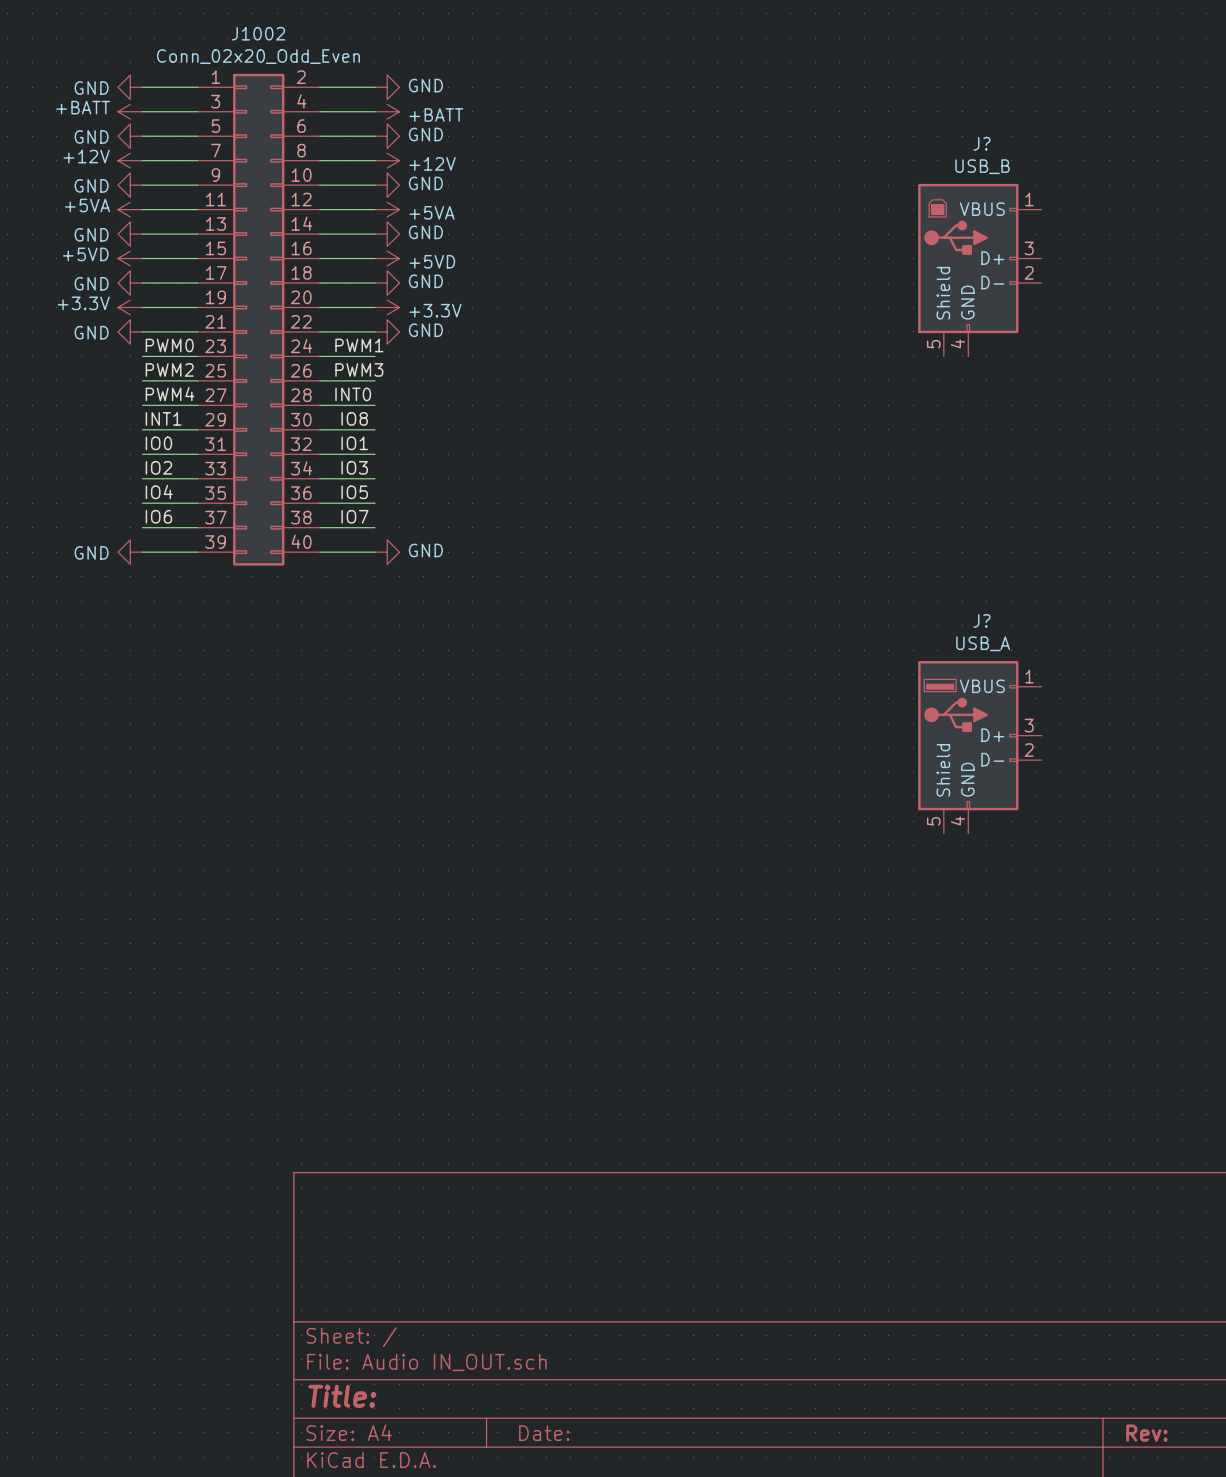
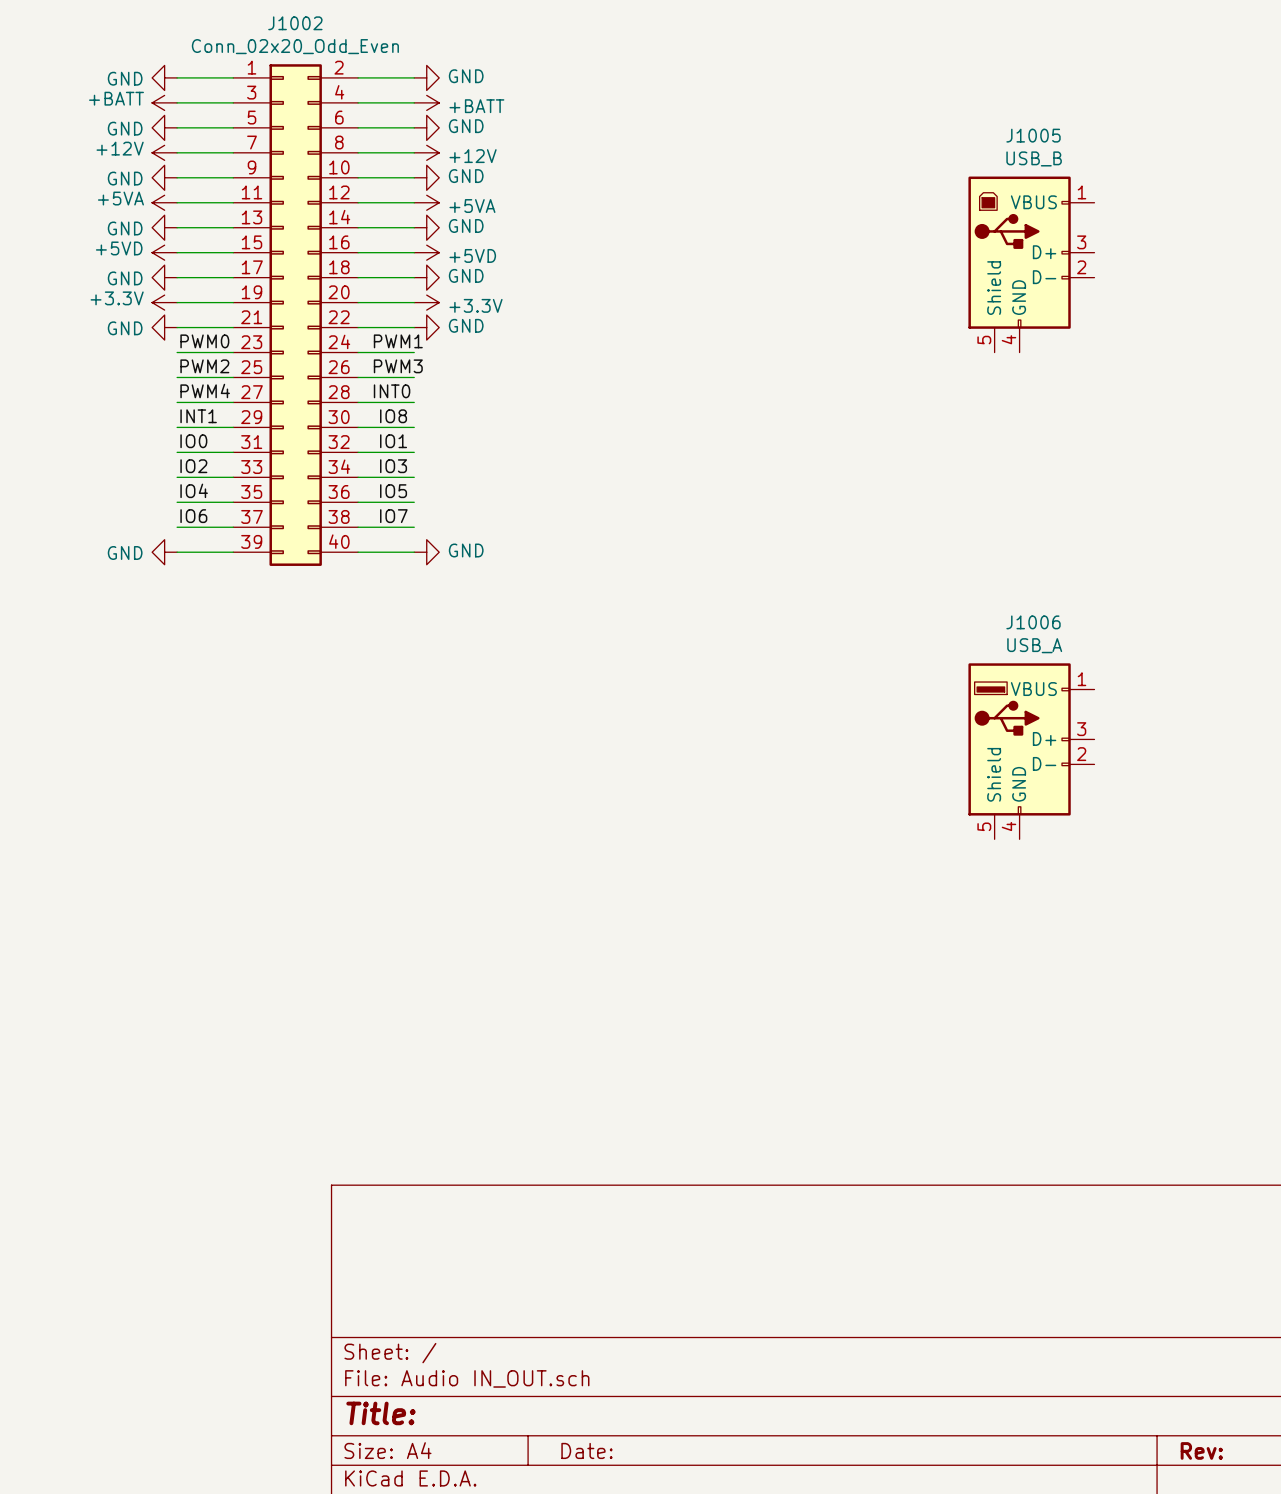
J? name: J? (981, 143) -> J1005 (1033, 135)
J? name: J? (981, 620) -> J1006 (1033, 622)

